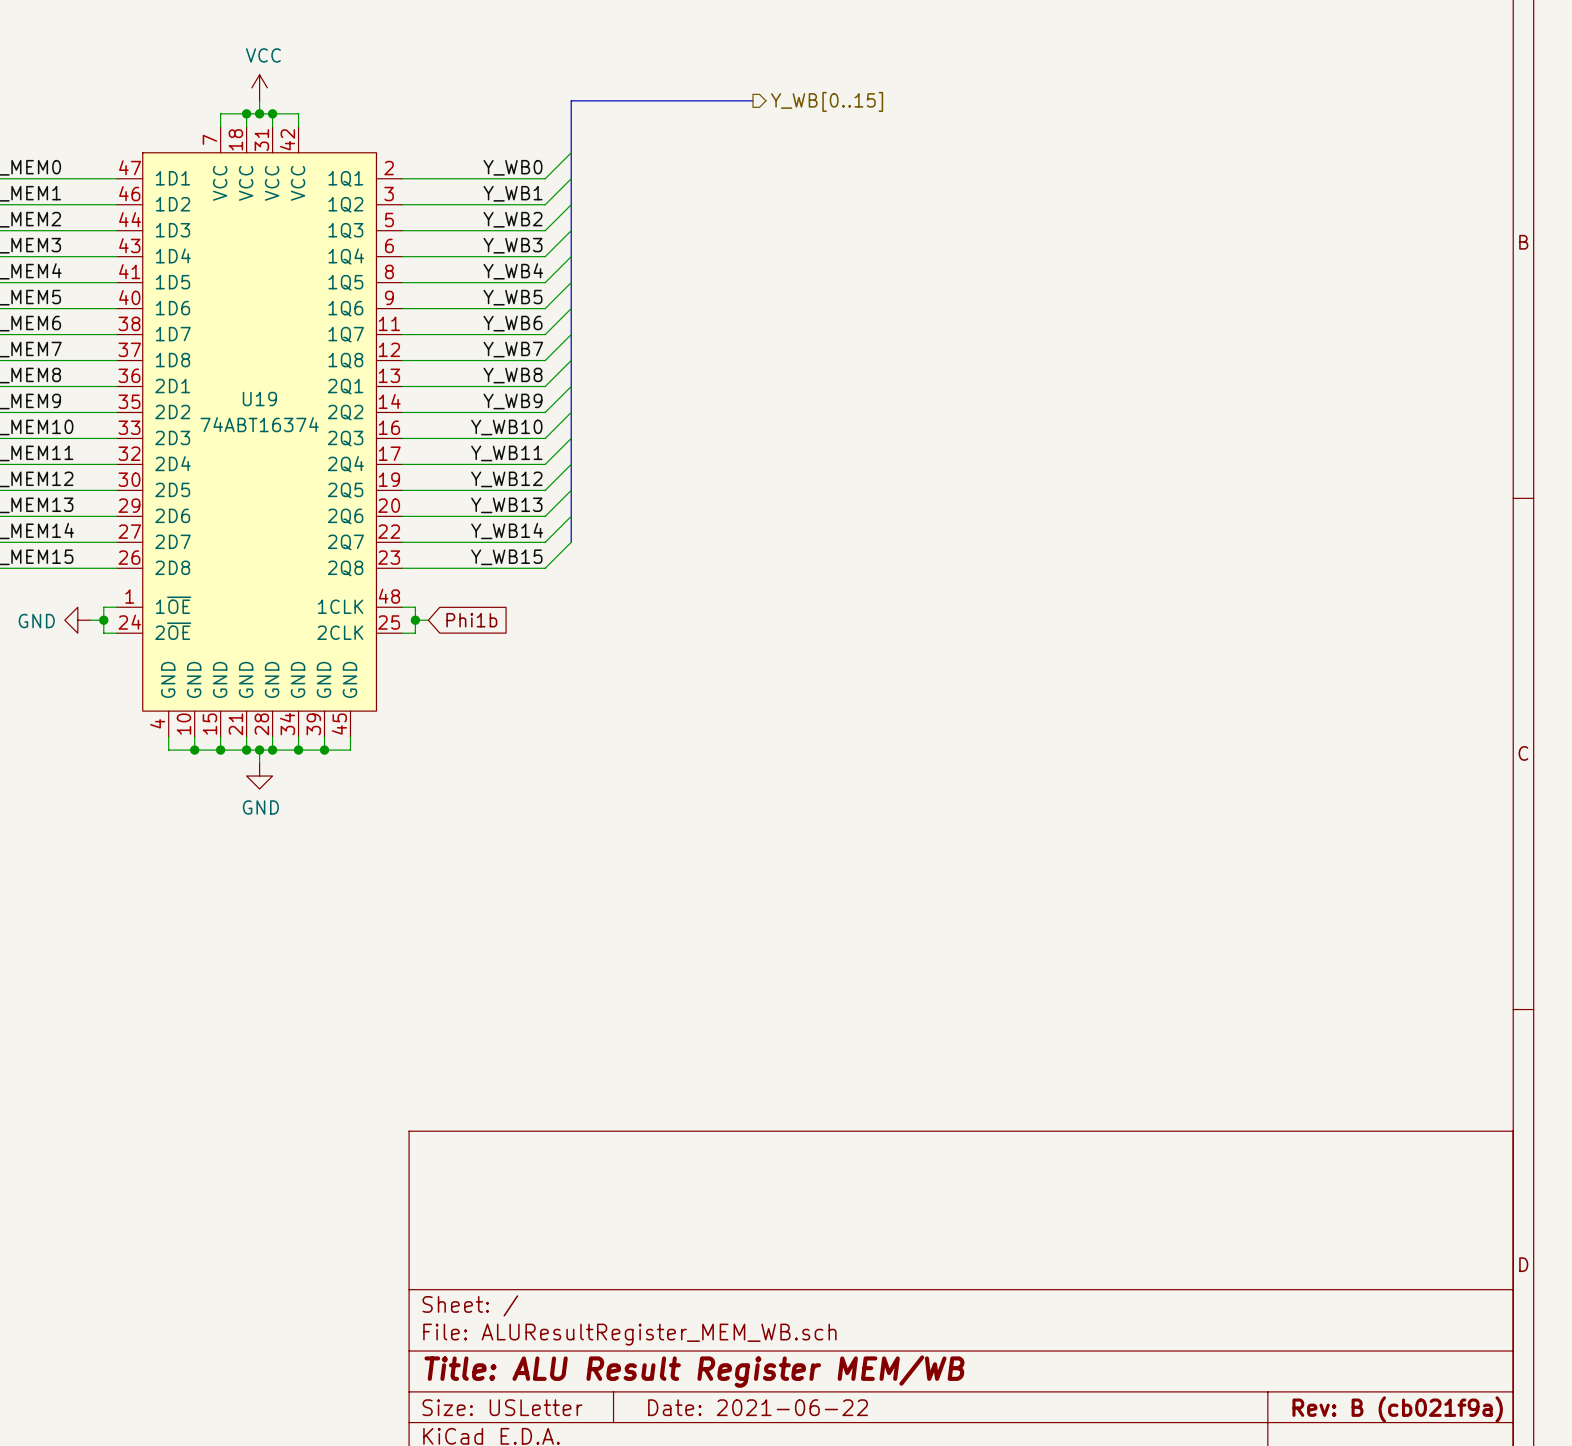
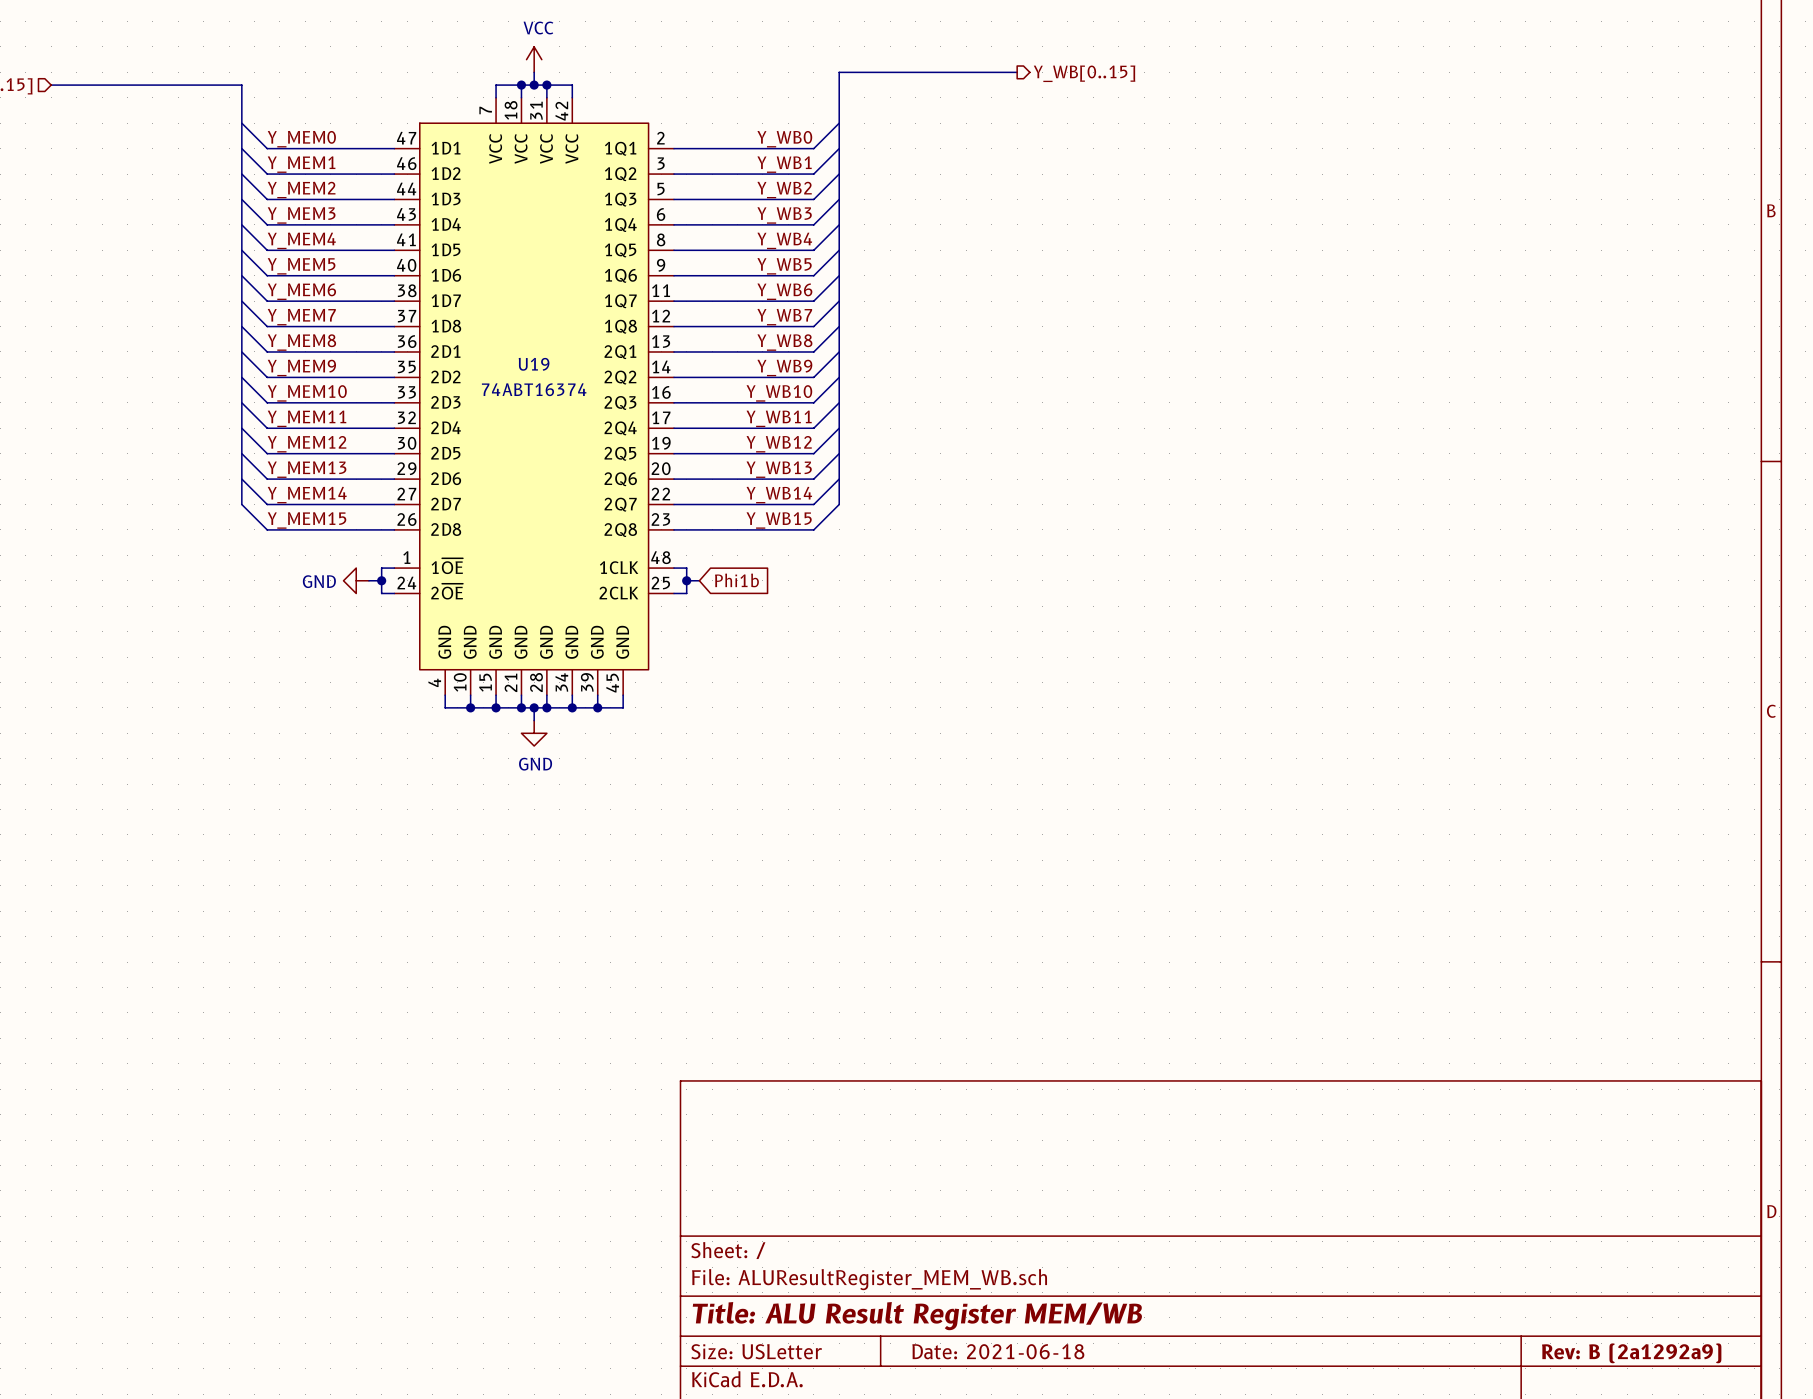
title block: Date: 2021-06-22 (758, 1407) -> Date: 2021-06-18 (998, 1351)
title block: Rev: B (cb021f9a) (1397, 1409) -> Rev: B (2a1292a9) (1631, 1353)

